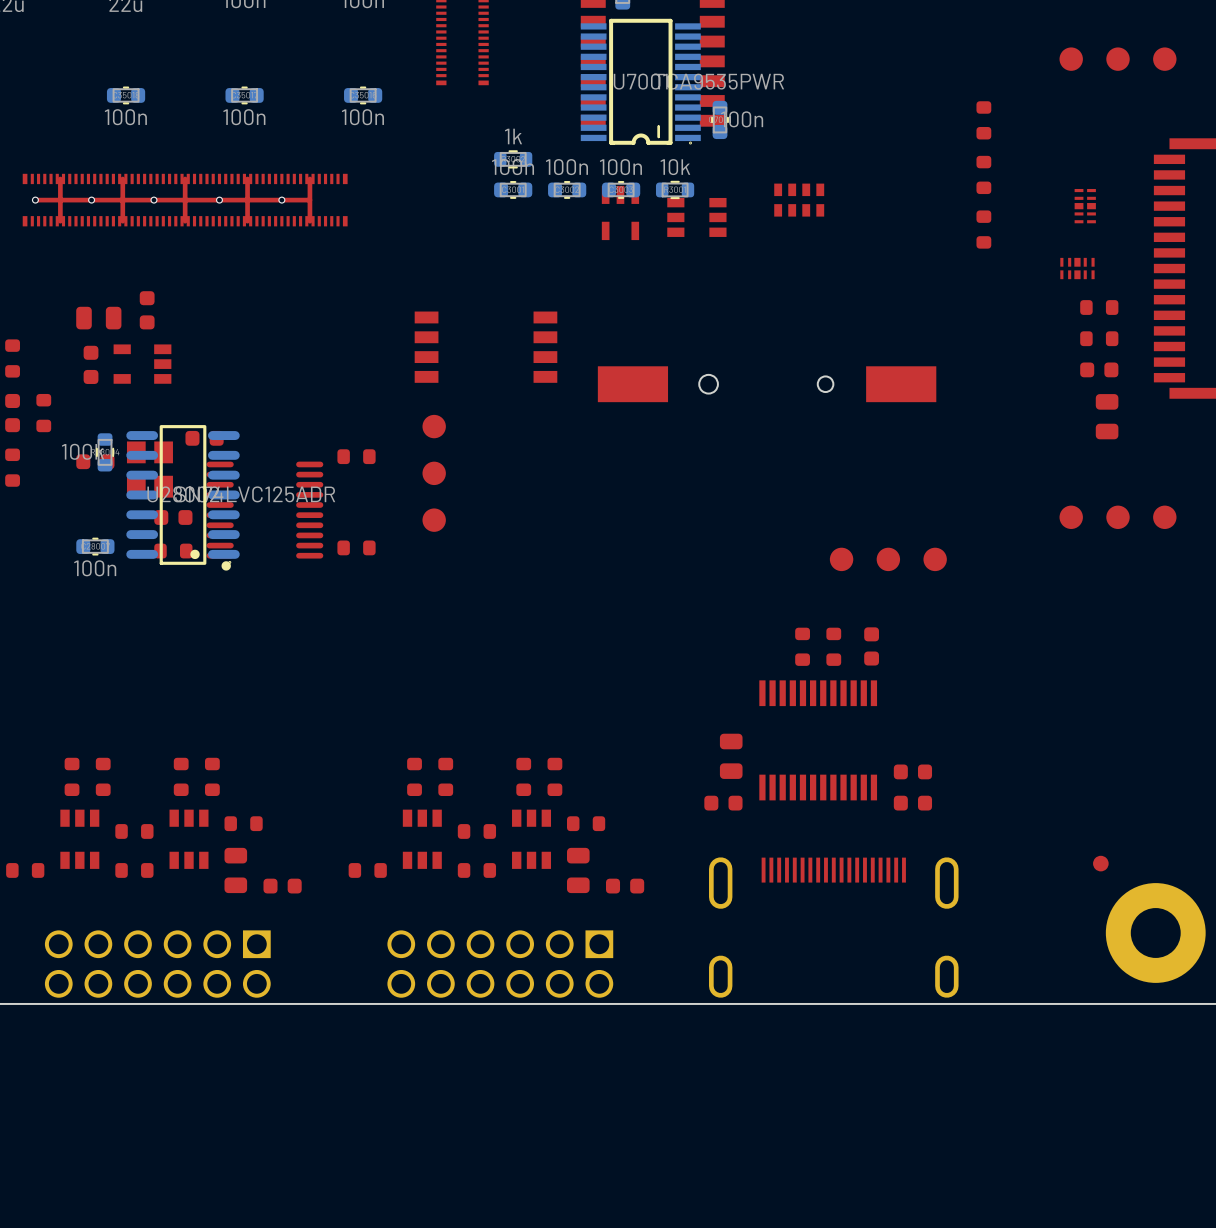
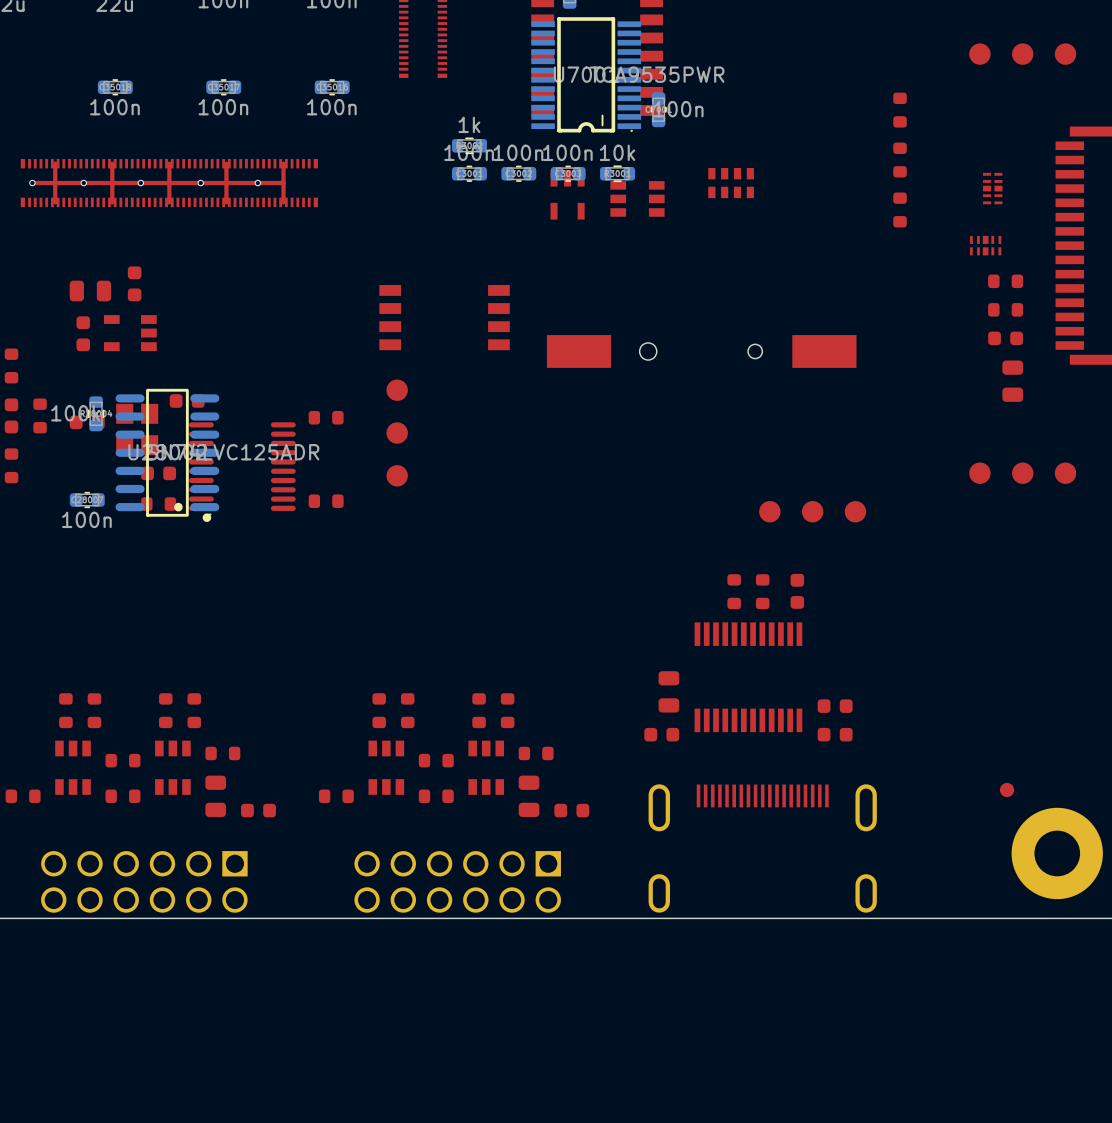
part: (12, 358) -> none
part footprint: [5, 393, 20, 433] -> [4, 348, 19, 384]
part position: (43, 413) -> (40, 415)
part footprint: [5, 448, 20, 487] -> [4, 398, 19, 434]
part: none -> (11, 465)

